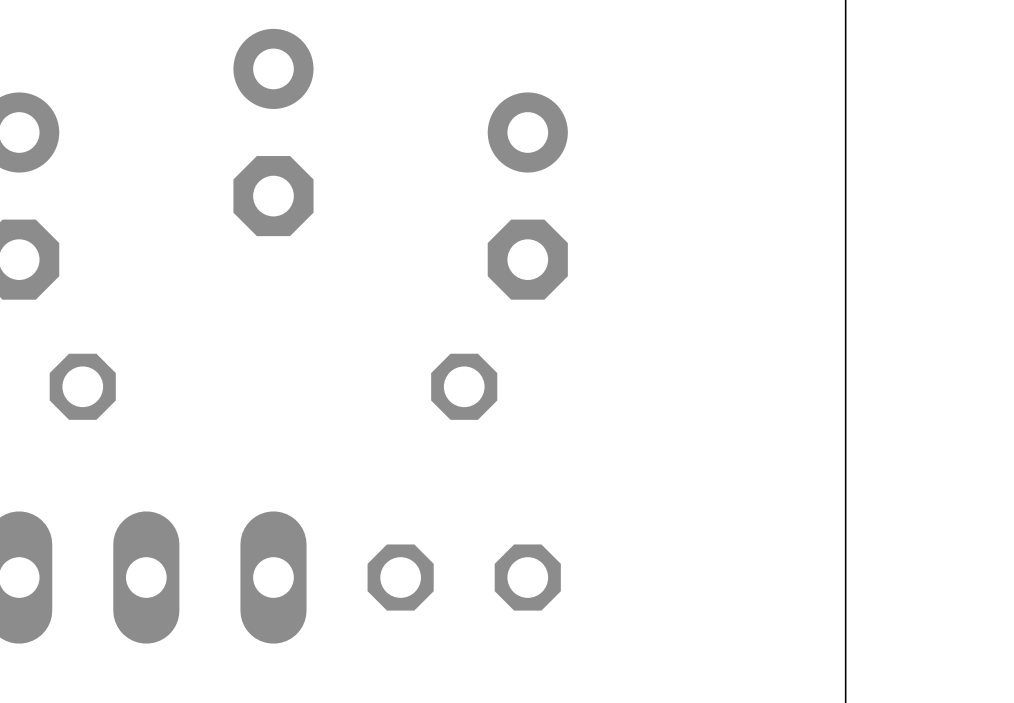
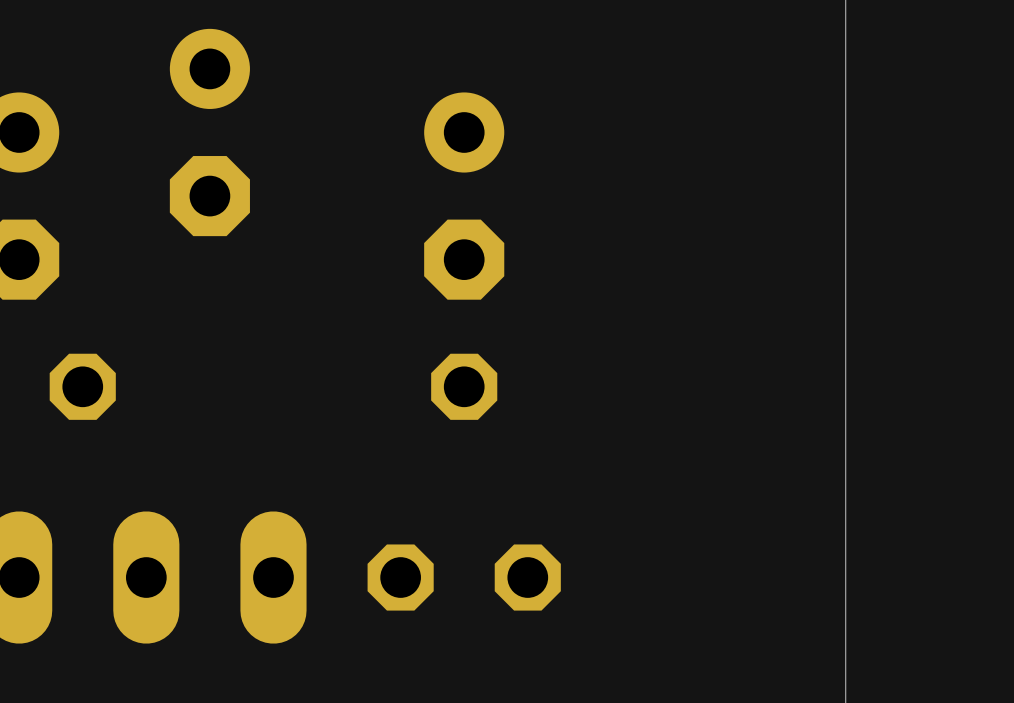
part position: (273, 132) -> (209, 132)
part position: (527, 196) -> (464, 196)

